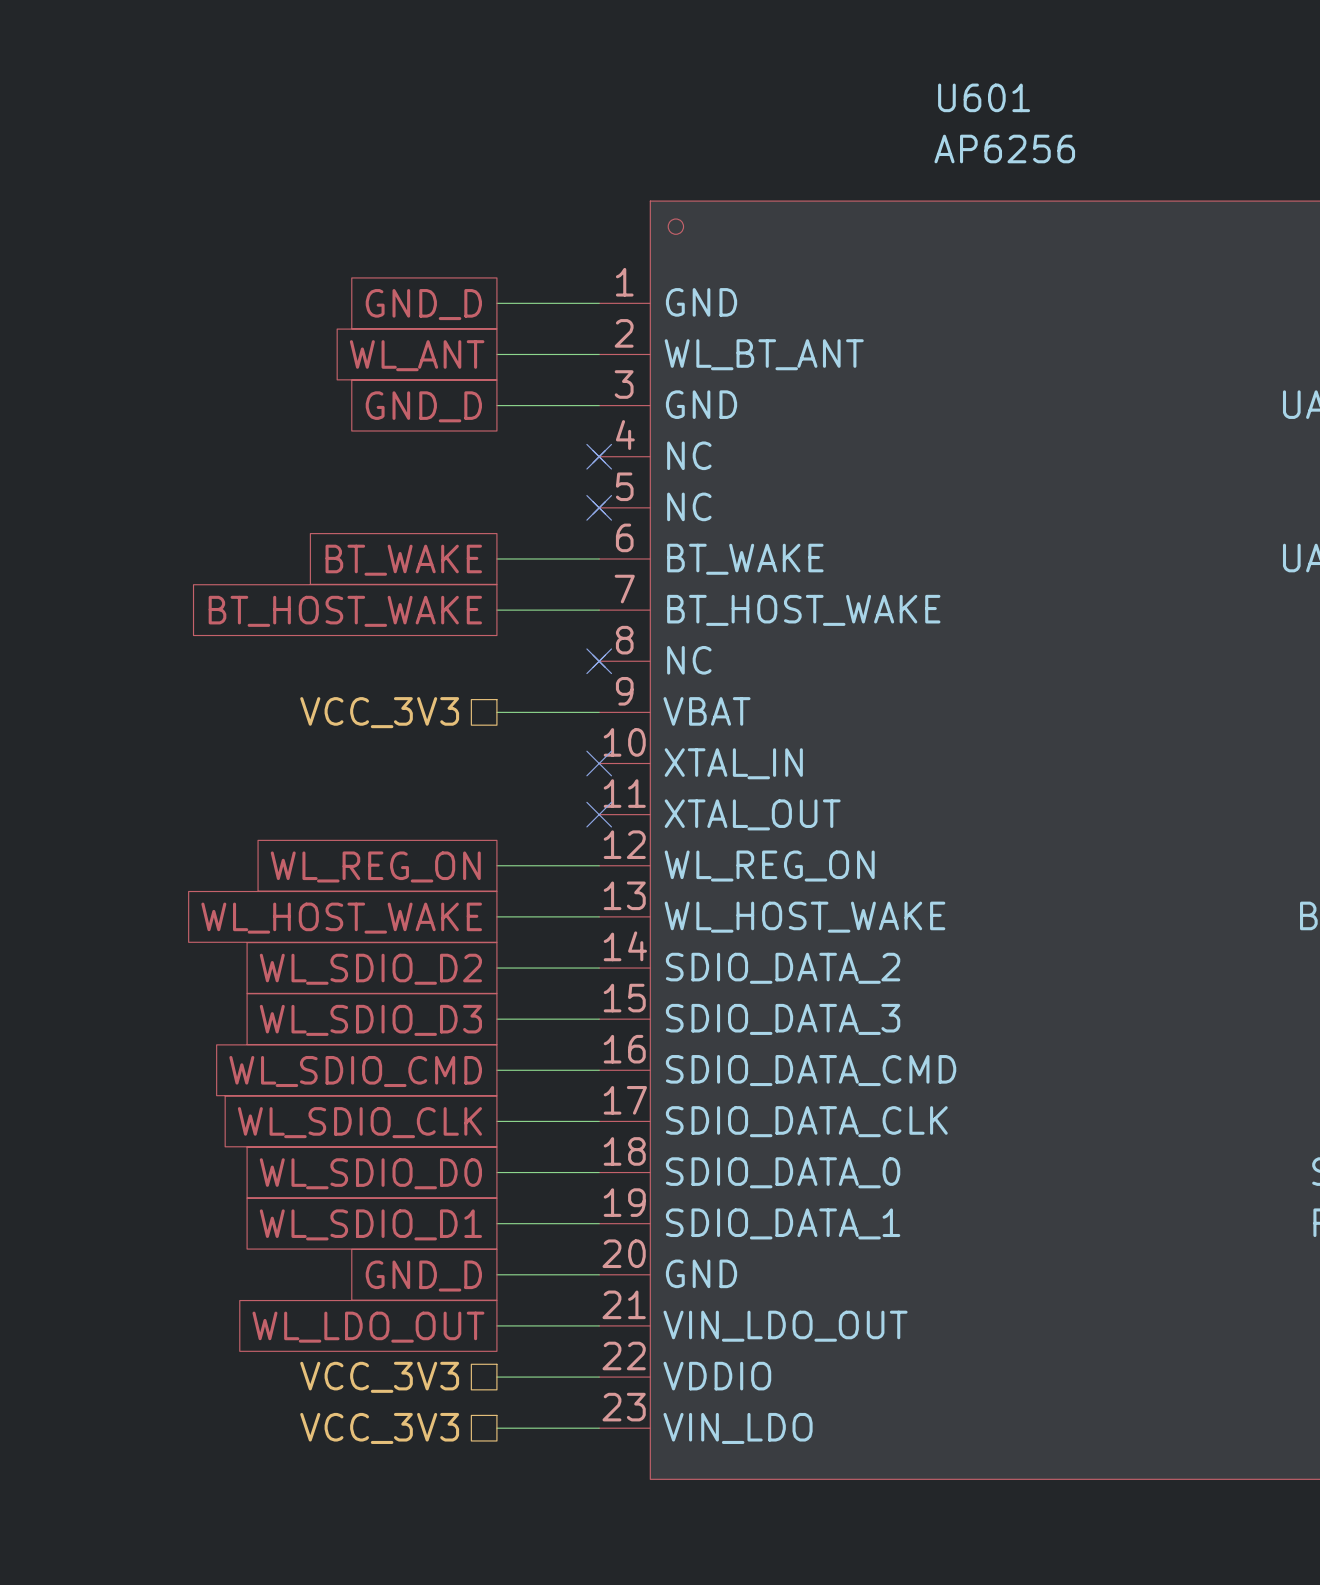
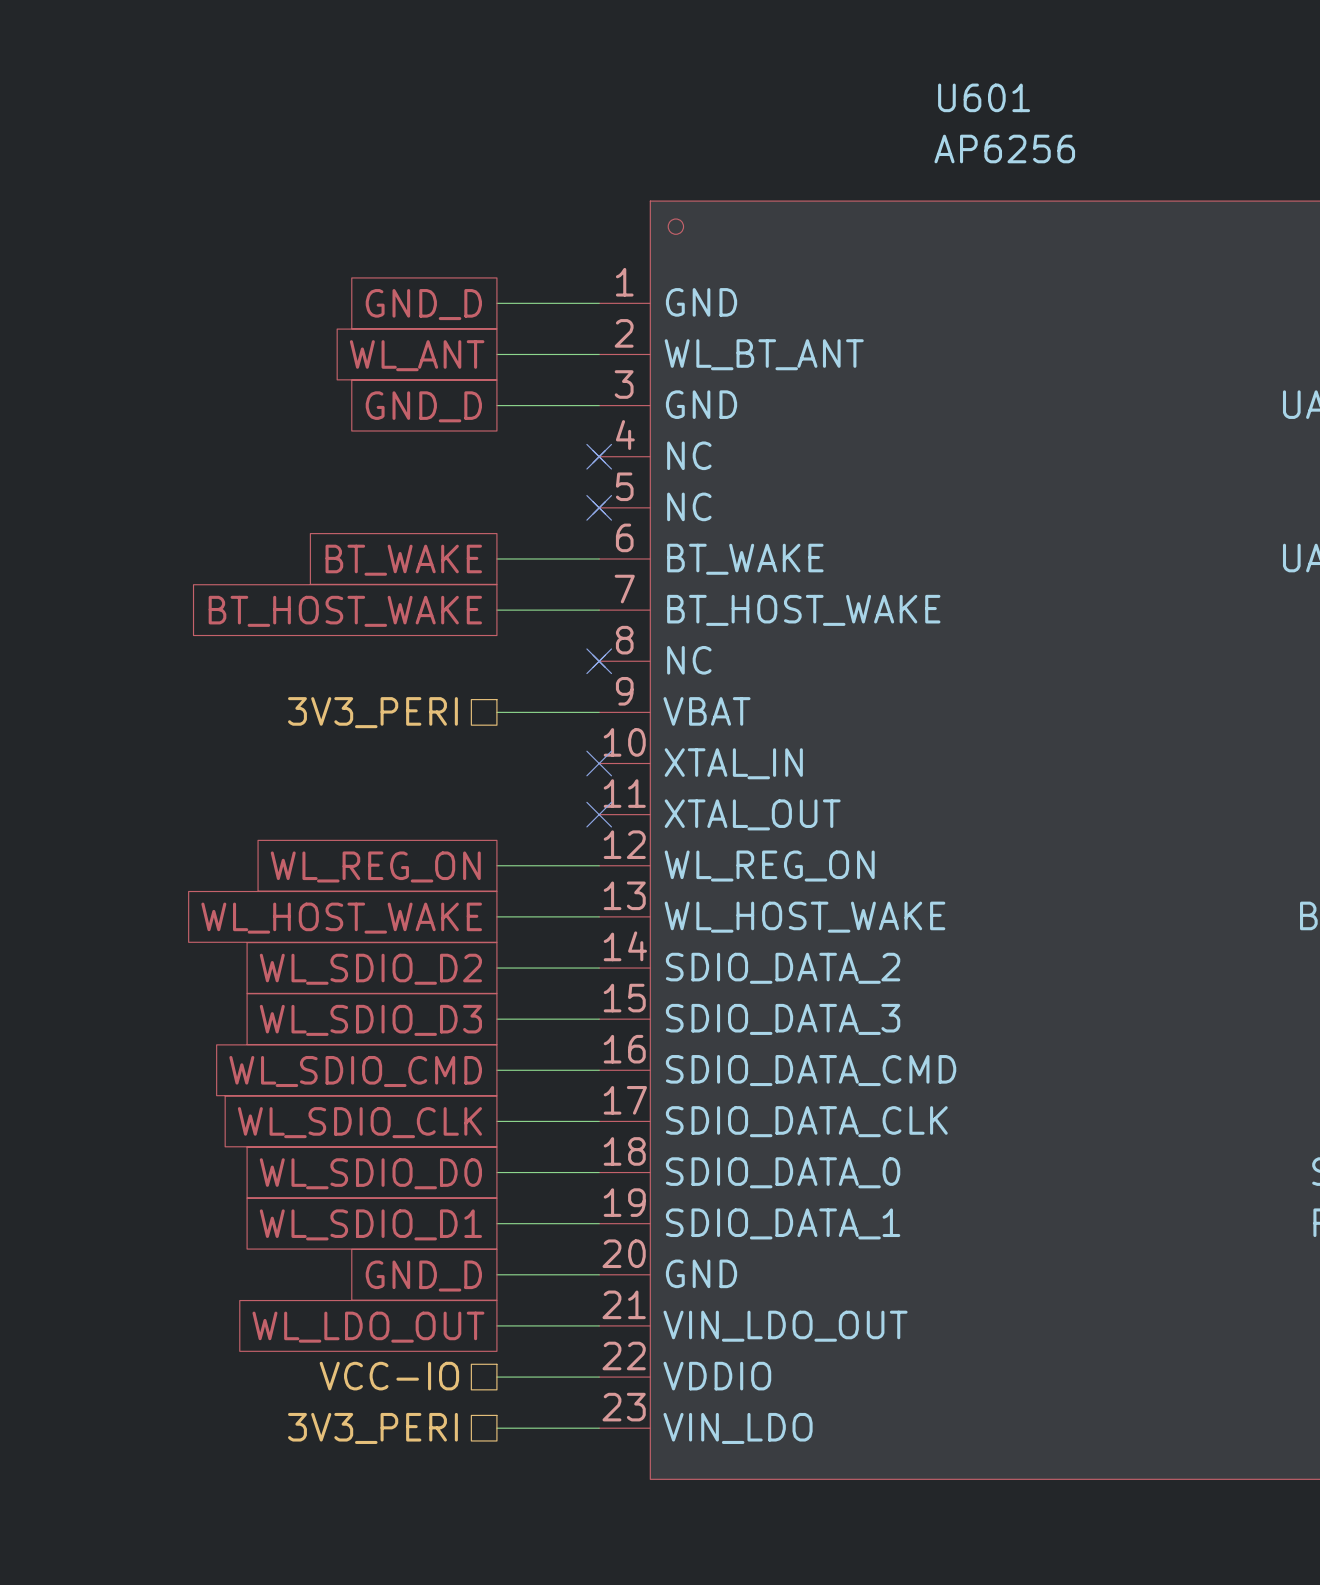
hierarchical label: VCC_3V3 (379, 712) -> 3V3_PERI (372, 712)
hierarchical label: VCC_3V3 (379, 1377) -> VCC-IO (389, 1376)
hierarchical label: VCC_3V3 (379, 1428) -> 3V3_PERI (372, 1428)

